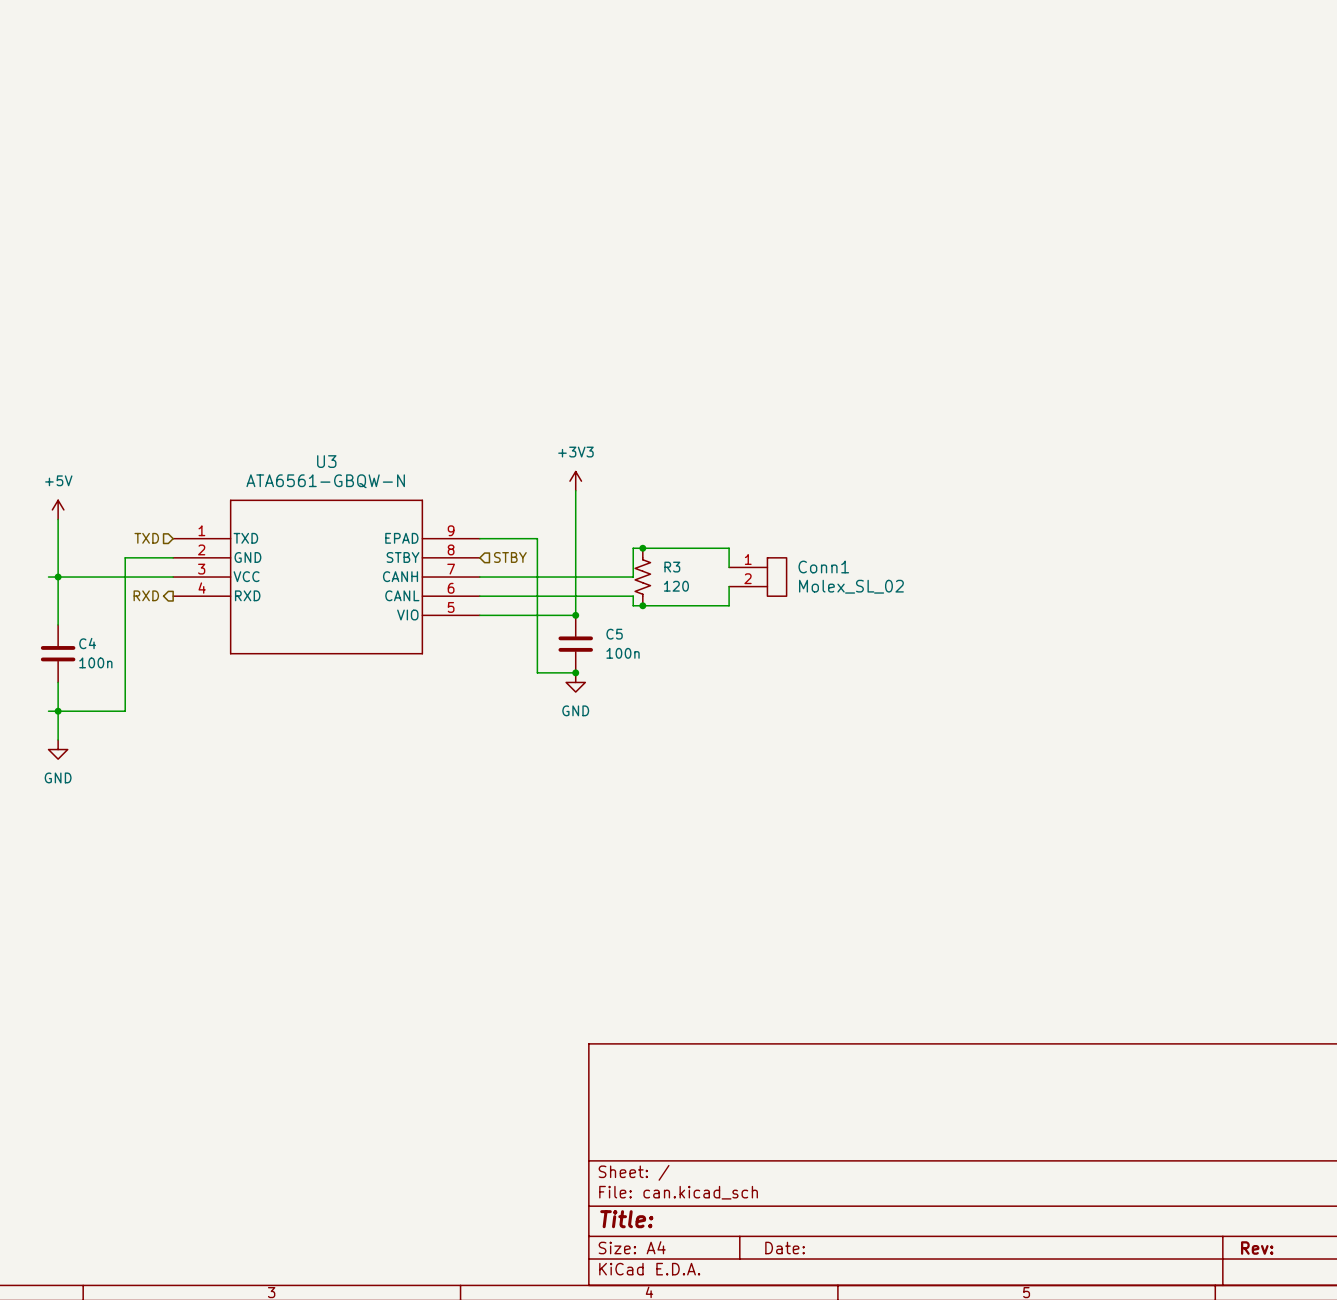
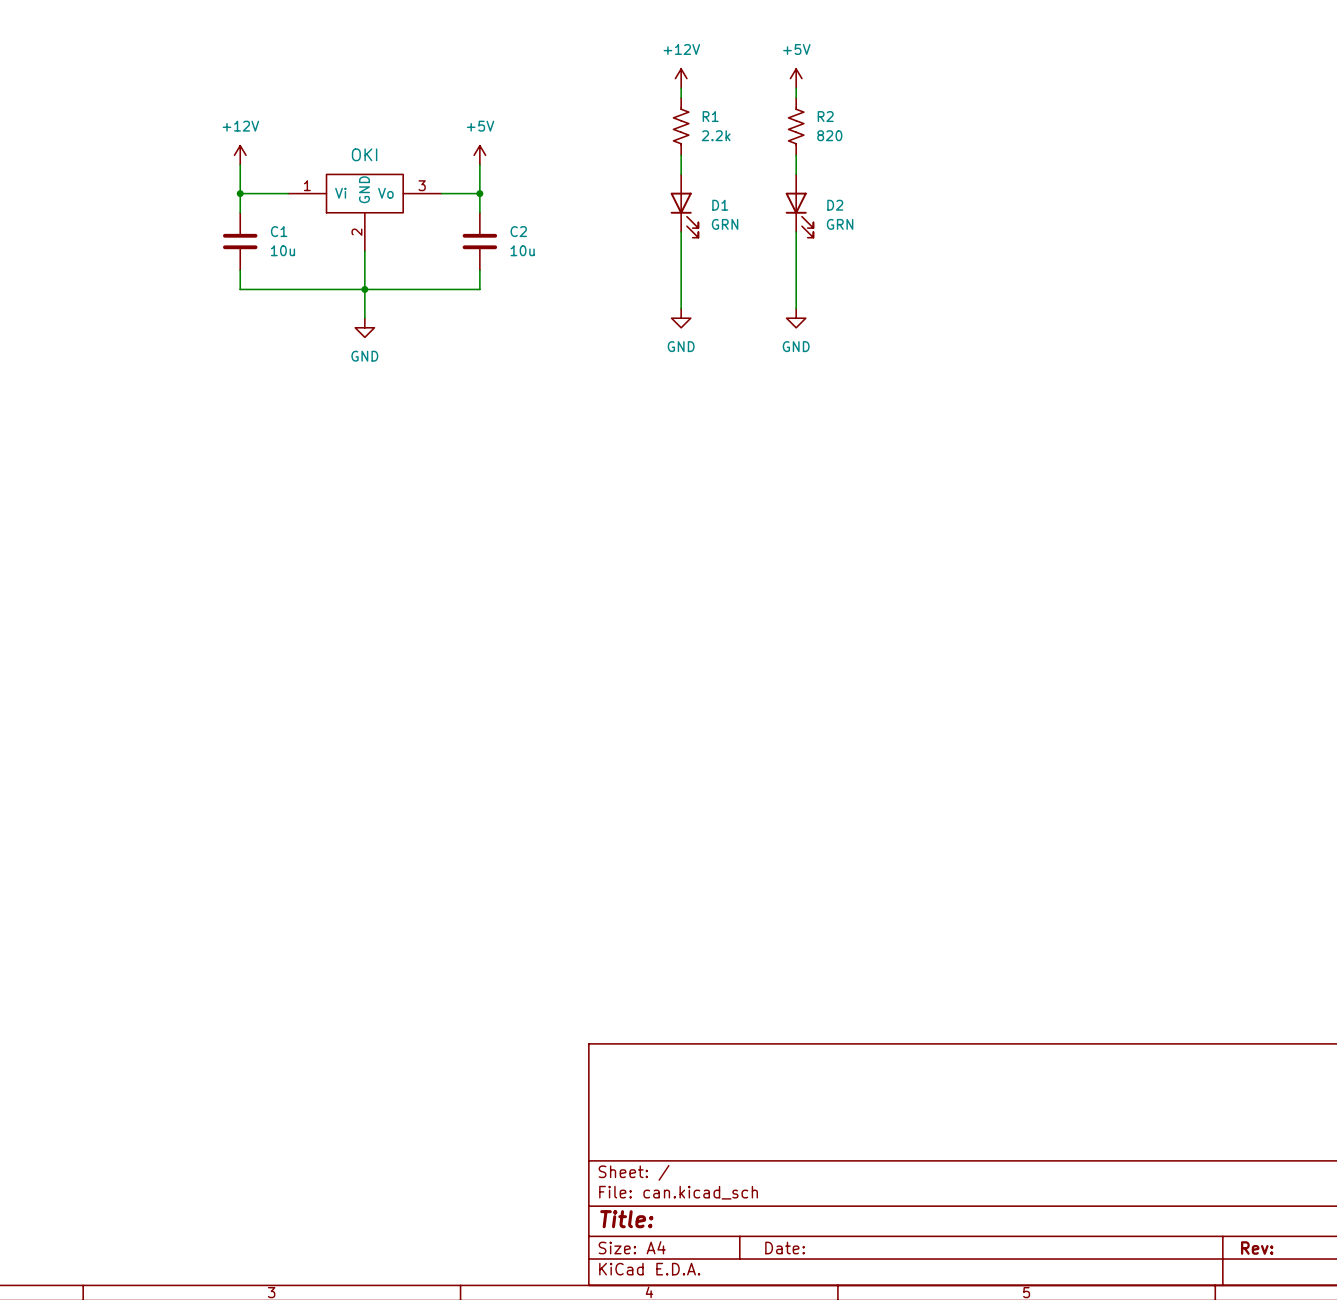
power symbol: none -> +12V (681, 78)
power symbol: none -> +5V (796, 78)
wire: none -> (681, 88) (681, 97)
wire: none -> (796, 88) (796, 97)
R1: none -> 2.2k (681, 126)
R2: none -> 820 (796, 126)
power symbol: none -> +12V (240, 155)
power symbol: none -> +5V (479, 155)
wire: none -> (681, 155) (681, 174)
wire: none -> (796, 155) (796, 174)
wire: none -> (240, 164) (240, 212)
wire: none -> (479, 164) (479, 212)
wire: none -> (240, 193) (288, 193)
junction: none -> (240, 193)
wire: none -> (441, 193) (479, 193)
junction: none -> (479, 193)
D1: none -> GRN (684, 206)
D2: none -> GRN (799, 206)
part: none -> OKI (364, 212)
wire: none -> (681, 231) (681, 308)
wire: none -> (796, 231) (796, 308)
C1: none -> 10u (240, 241)
C2: none -> 10u (479, 241)
wire: none -> (364, 251) (364, 318)
wire: none -> (240, 270) (240, 289) (479, 289) (479, 270)
junction: none -> (364, 289)
power symbol: none -> GND (681, 318)
power symbol: none -> GND (796, 318)
power symbol: none -> GND (364, 327)
power symbol: +3V3 (575, 481) -> none
wire: (575, 490) (575, 615) (479, 615) -> none
power symbol: +5V (58, 509) -> none
wire: (58, 519) (58, 624) -> none
hierarchical label: TXD (146, 538) -> none
wire: (479, 538) (537, 538) (537, 672) (575, 672) -> none
junction: (642, 548) -> none
wire: (173, 557) (125, 557) (125, 711) (48, 711) -> none
hierarchical label: STBY (510, 557) -> none
wire: (729, 567) (729, 548) (633, 548) (633, 577) (479, 577) -> none
wire: (48, 577) (173, 577) -> none
junction: (58, 577) -> none
U3: ATA6561-GBQW-N (326, 577) -> none
R3: 120 (642, 577) -> none
Conn1: Molex_SL_02 (757, 577) -> none
wire: (729, 586) (729, 605) (633, 605) (633, 596) (479, 596) -> none
hierarchical label: RXD (146, 595) -> none
junction: (642, 605) -> none
junction: (575, 615) -> none
C5: 100n (575, 644) -> none
C4: 100n (58, 653) -> none
junction: (575, 672) -> none
wire: (58, 682) (58, 739) -> none
power symbol: GND (575, 682) -> none
junction: (58, 711) -> none
power symbol: GND (58, 749) -> none

